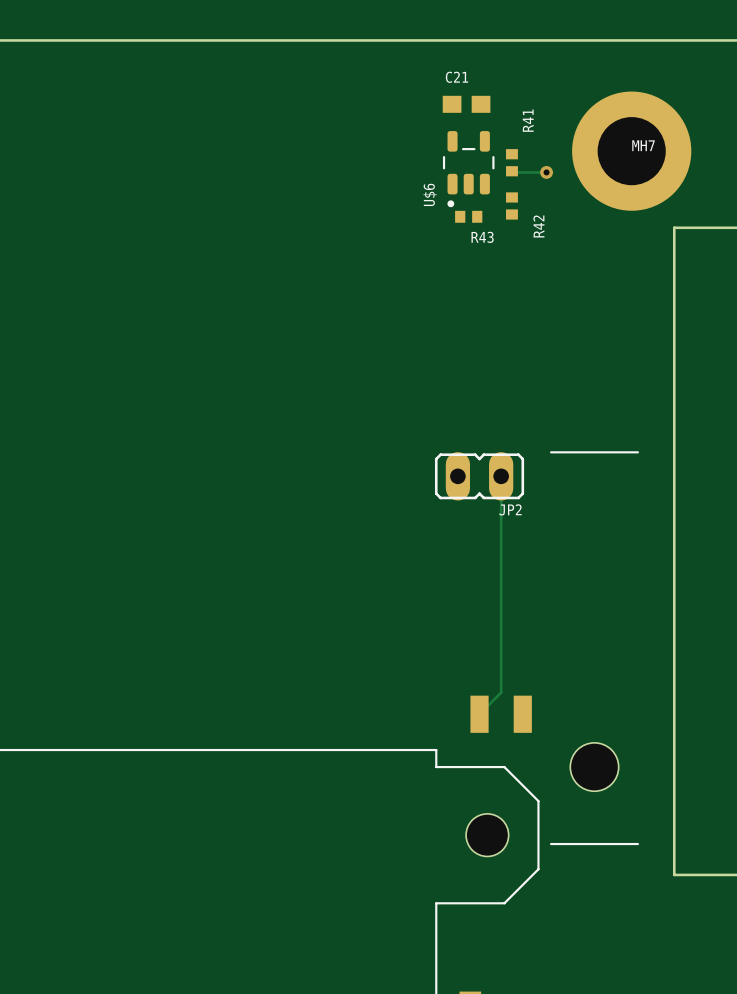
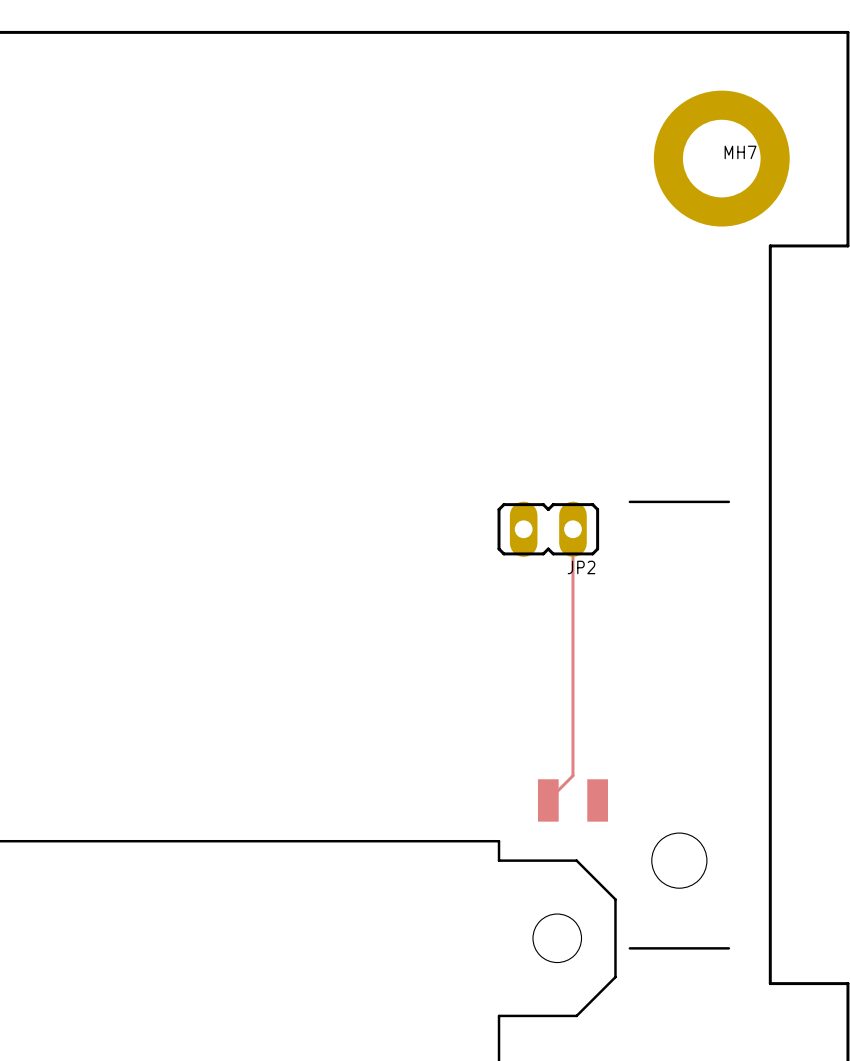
C21: (466, 104) -> none
R41: (511, 162) -> none
U$6: (468, 169) -> none
track: (511, 171) (546, 172) -> none
via: (546, 172) -> none
R42: (511, 205) -> none
R43: (468, 216) -> none

